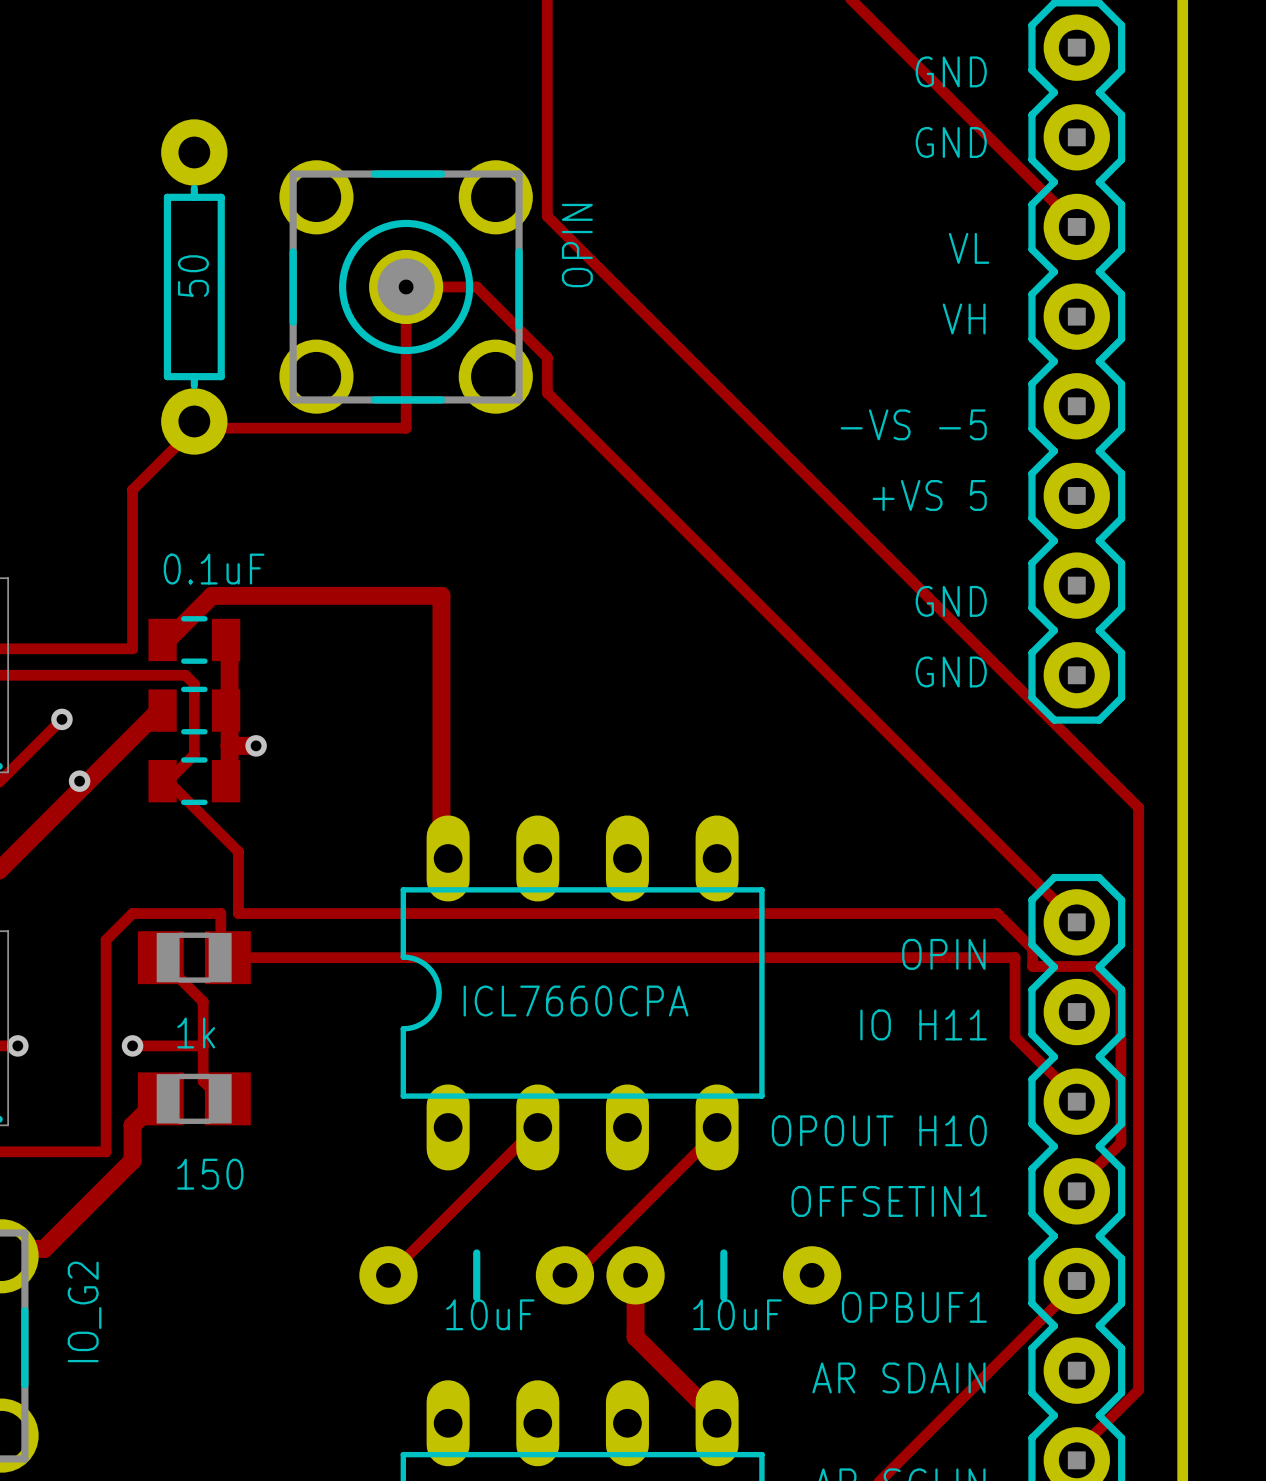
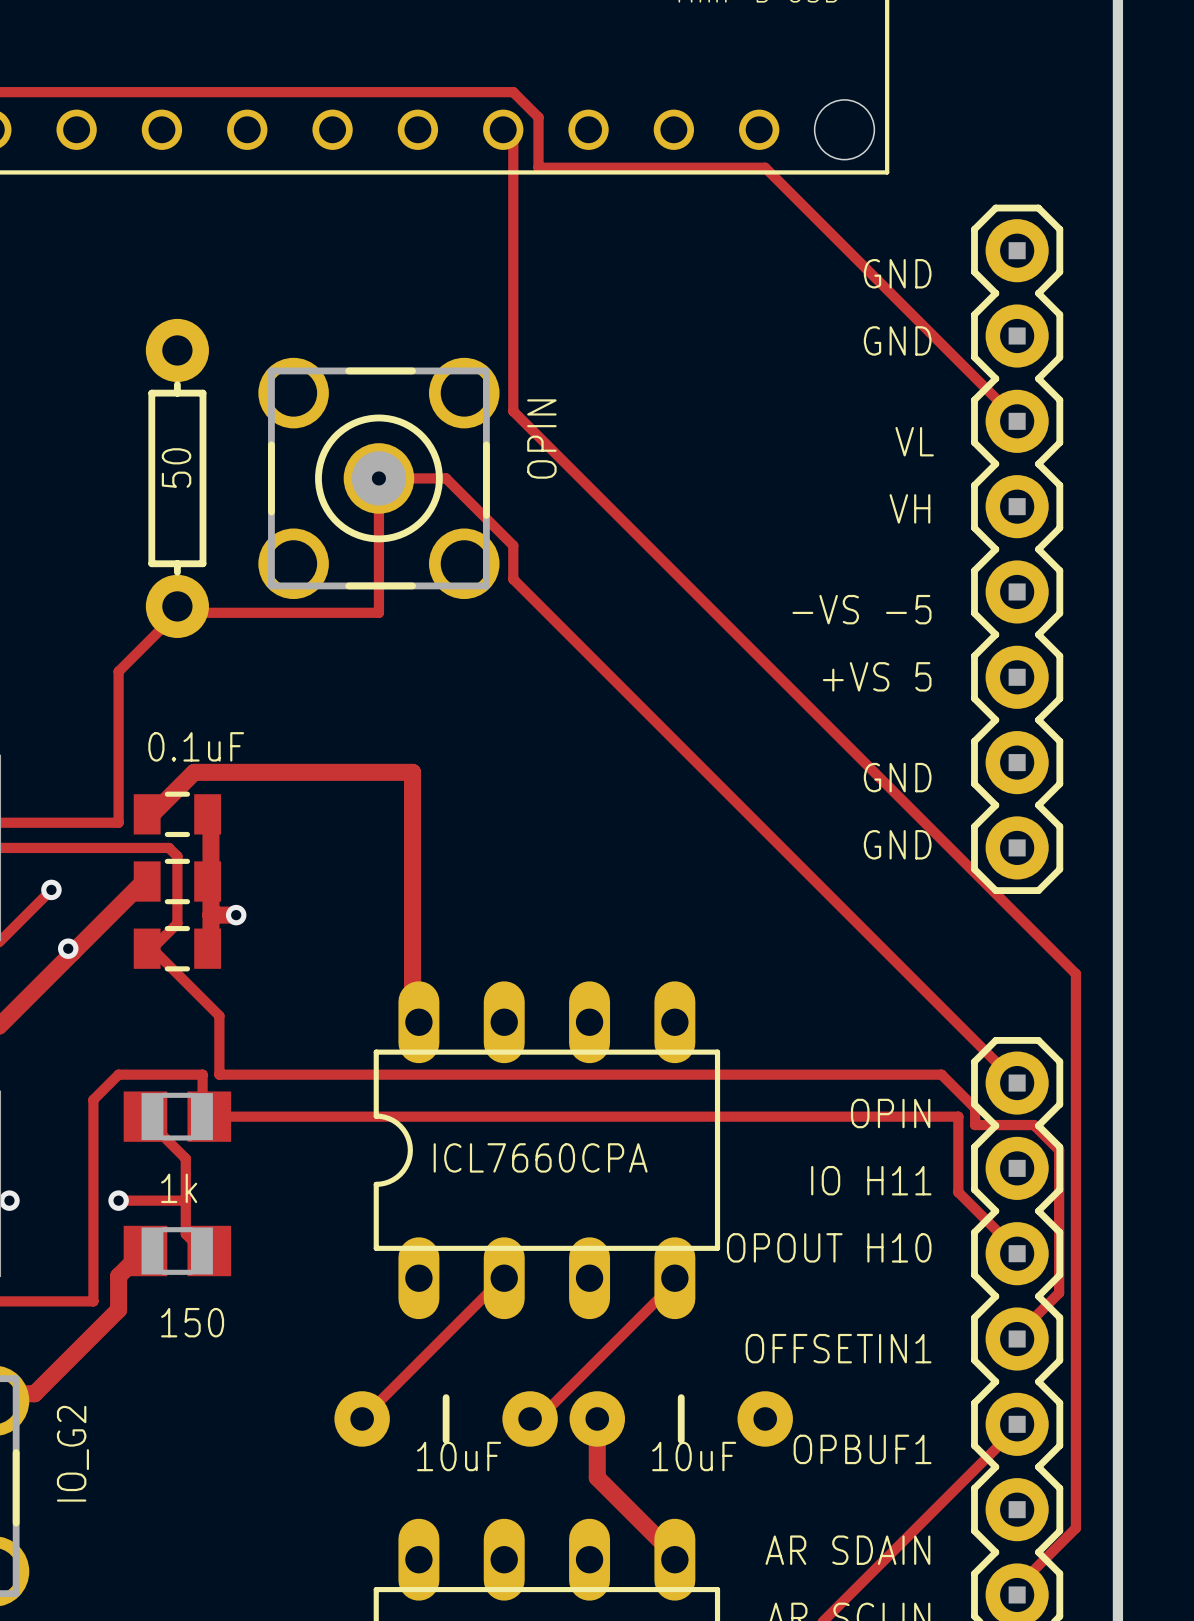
text position: OPOUT H10 (879, 1130) -> OPOUT H10 (829, 1247)
text position: AR SDAIN (898, 1377) -> AR SDAIN (847, 1550)

